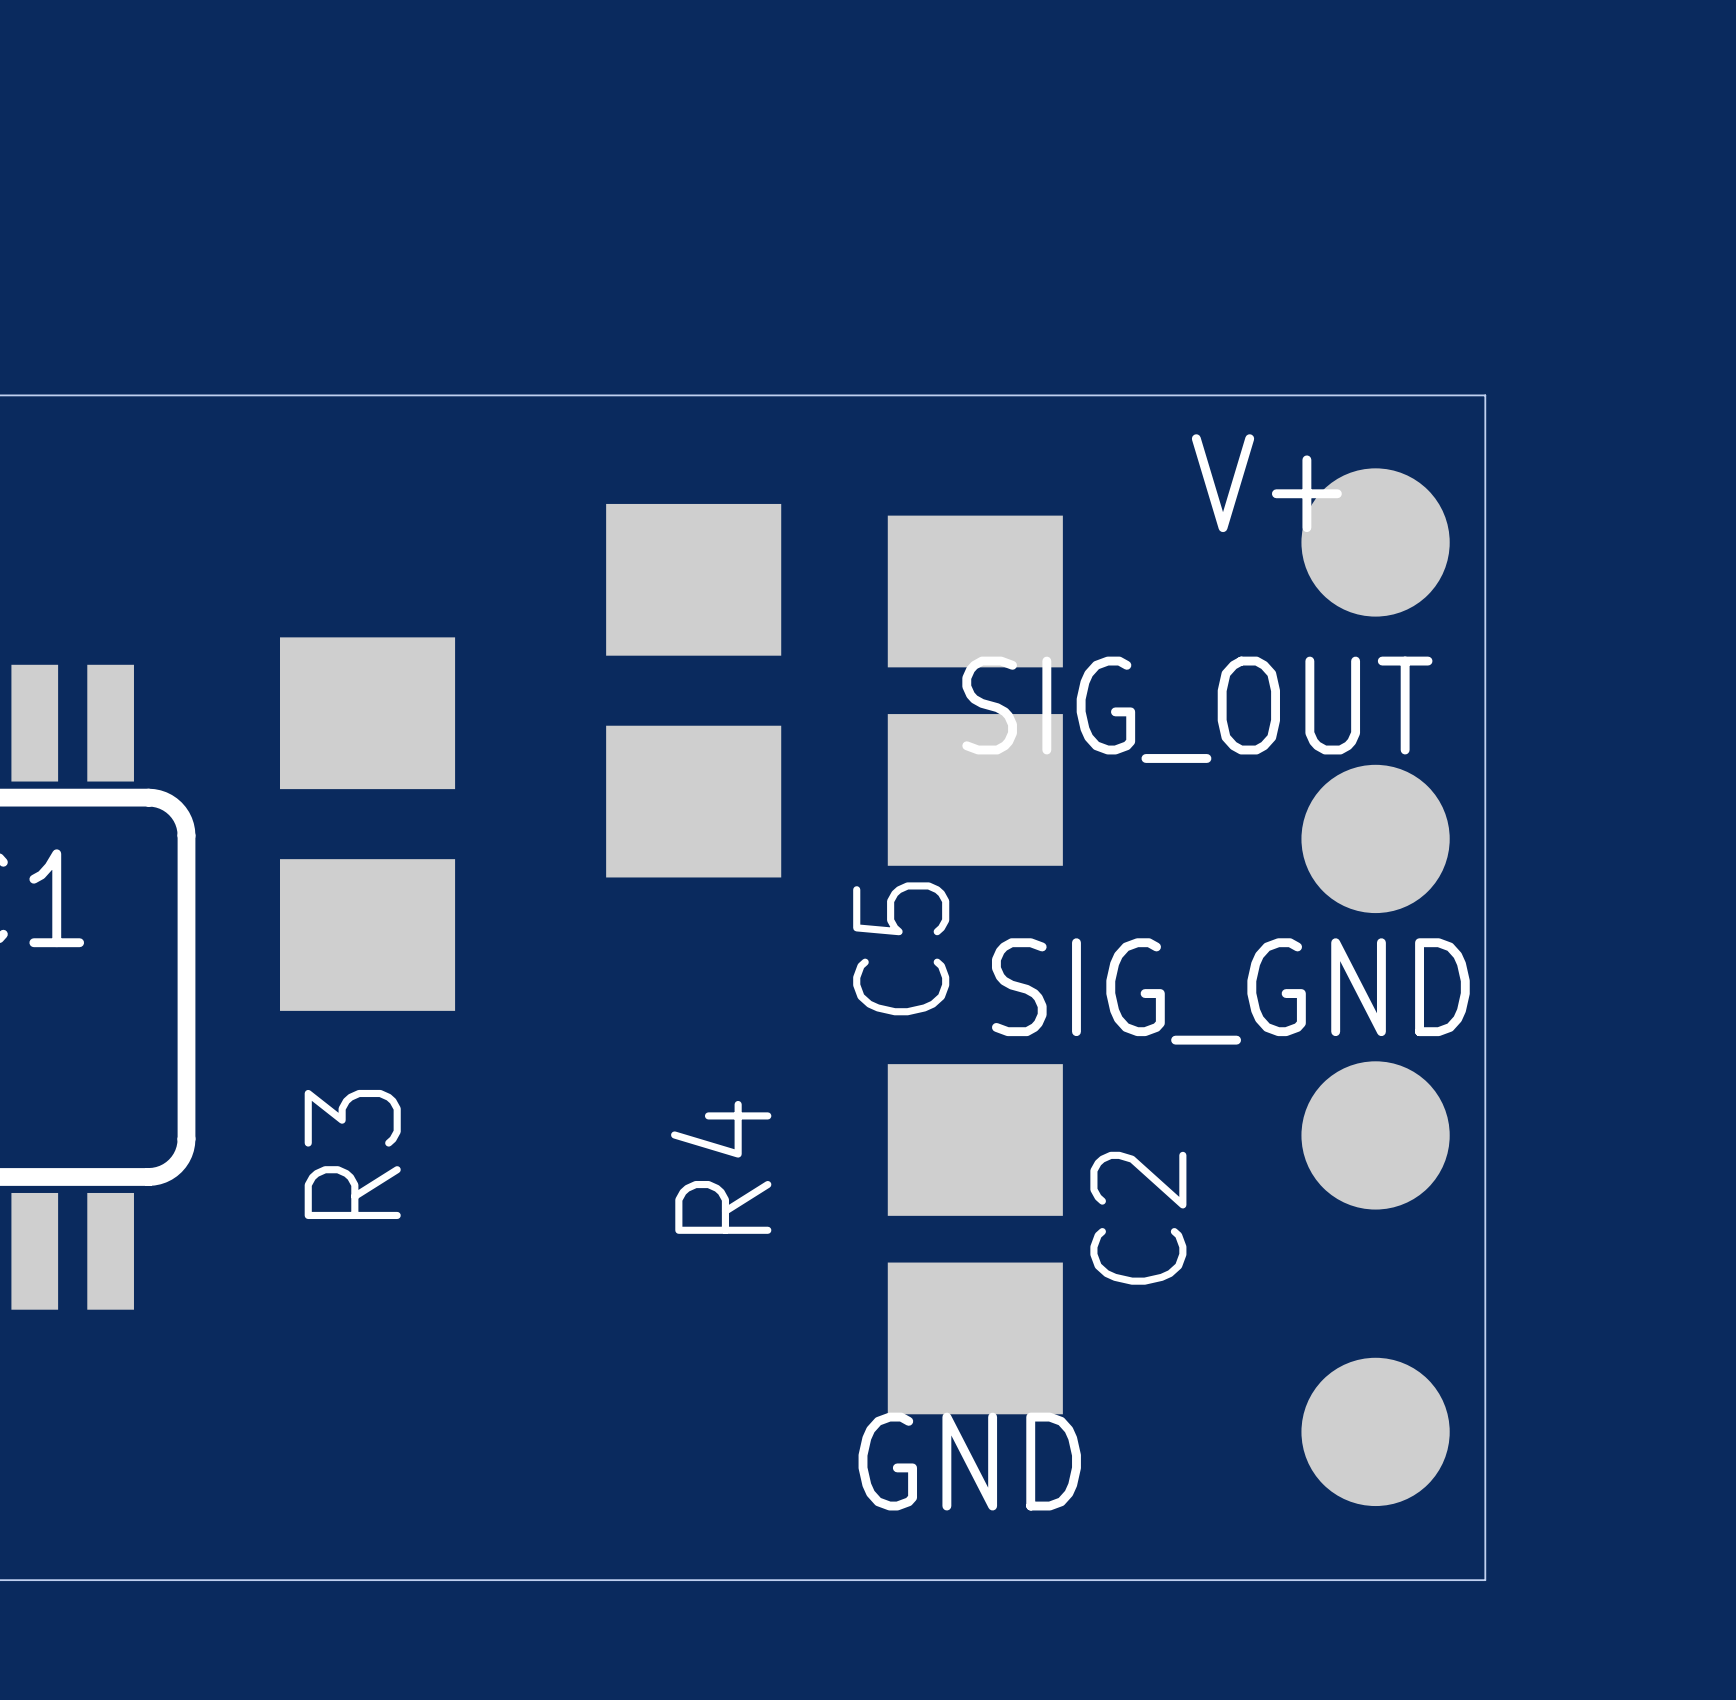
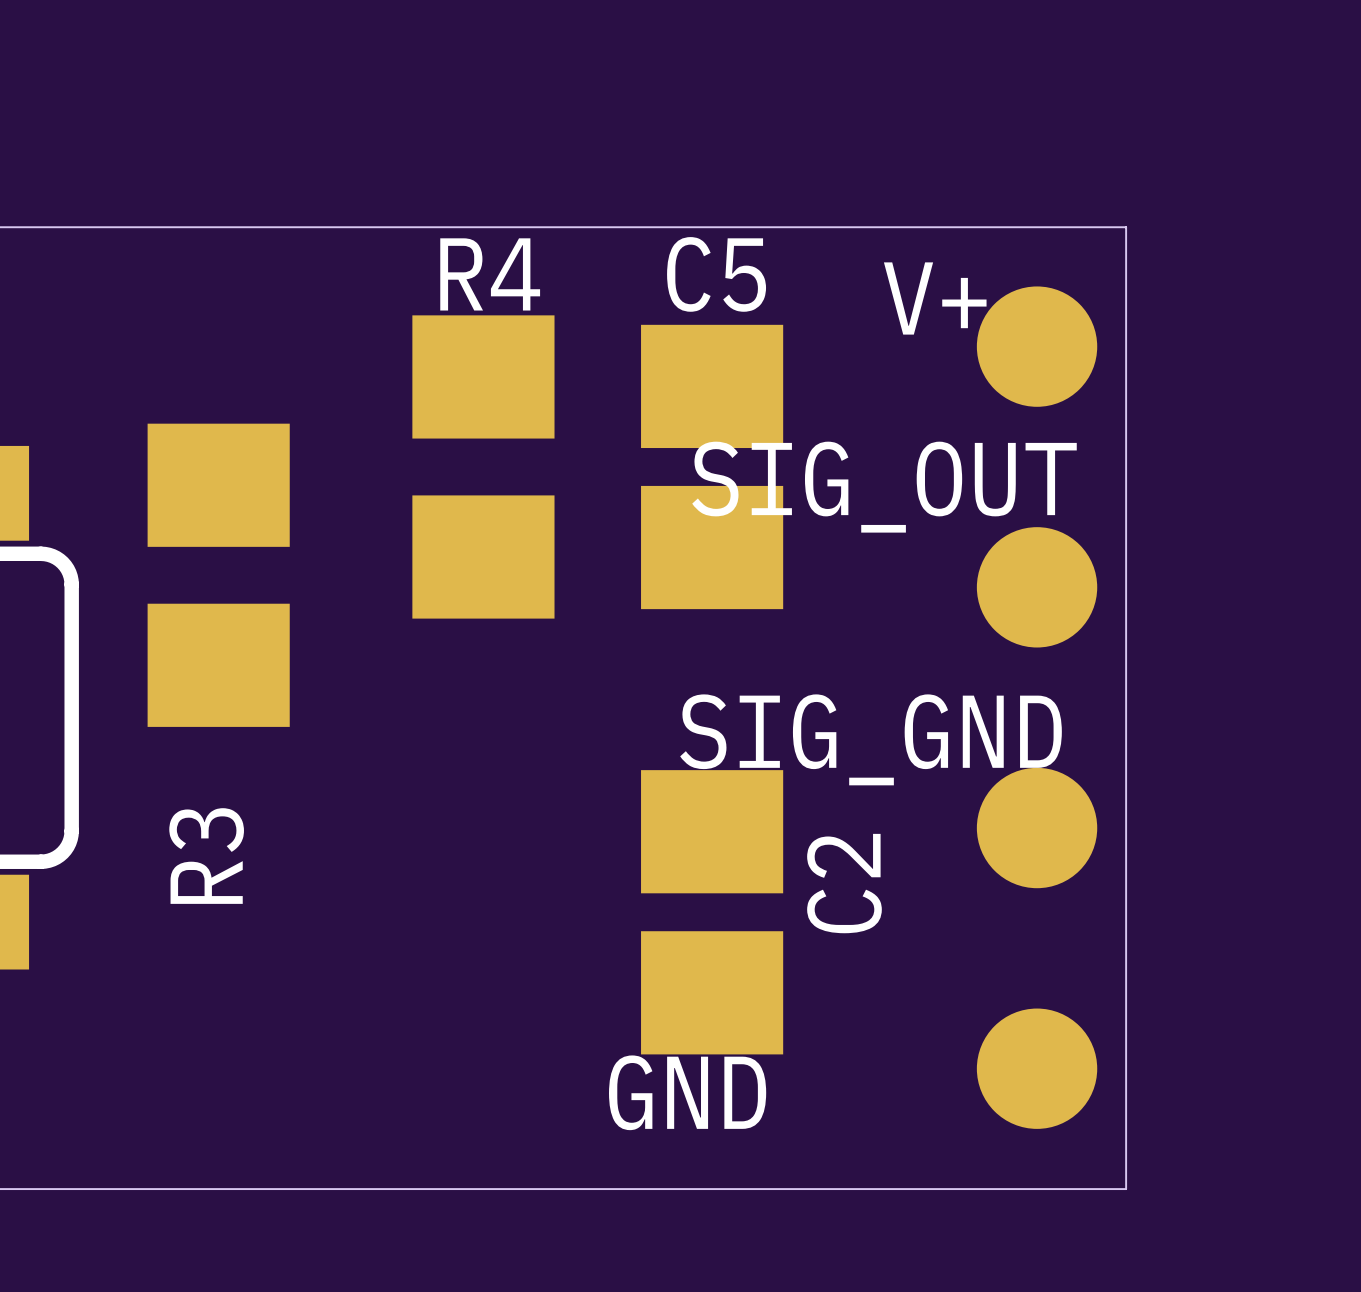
C5 name rotation: 0° (901, 948) -> 90° clockwise (716, 274)
C5 name position: C5 (901, 948) -> C5 (716, 274)
SIG_GND name position: SIG_GND (1230, 991) -> SIG_GND (871, 739)
R4 name rotation: 0° (721, 1167) -> 90° clockwise (490, 274)
R4 name position: R4 (721, 1167) -> R4 (490, 274)

